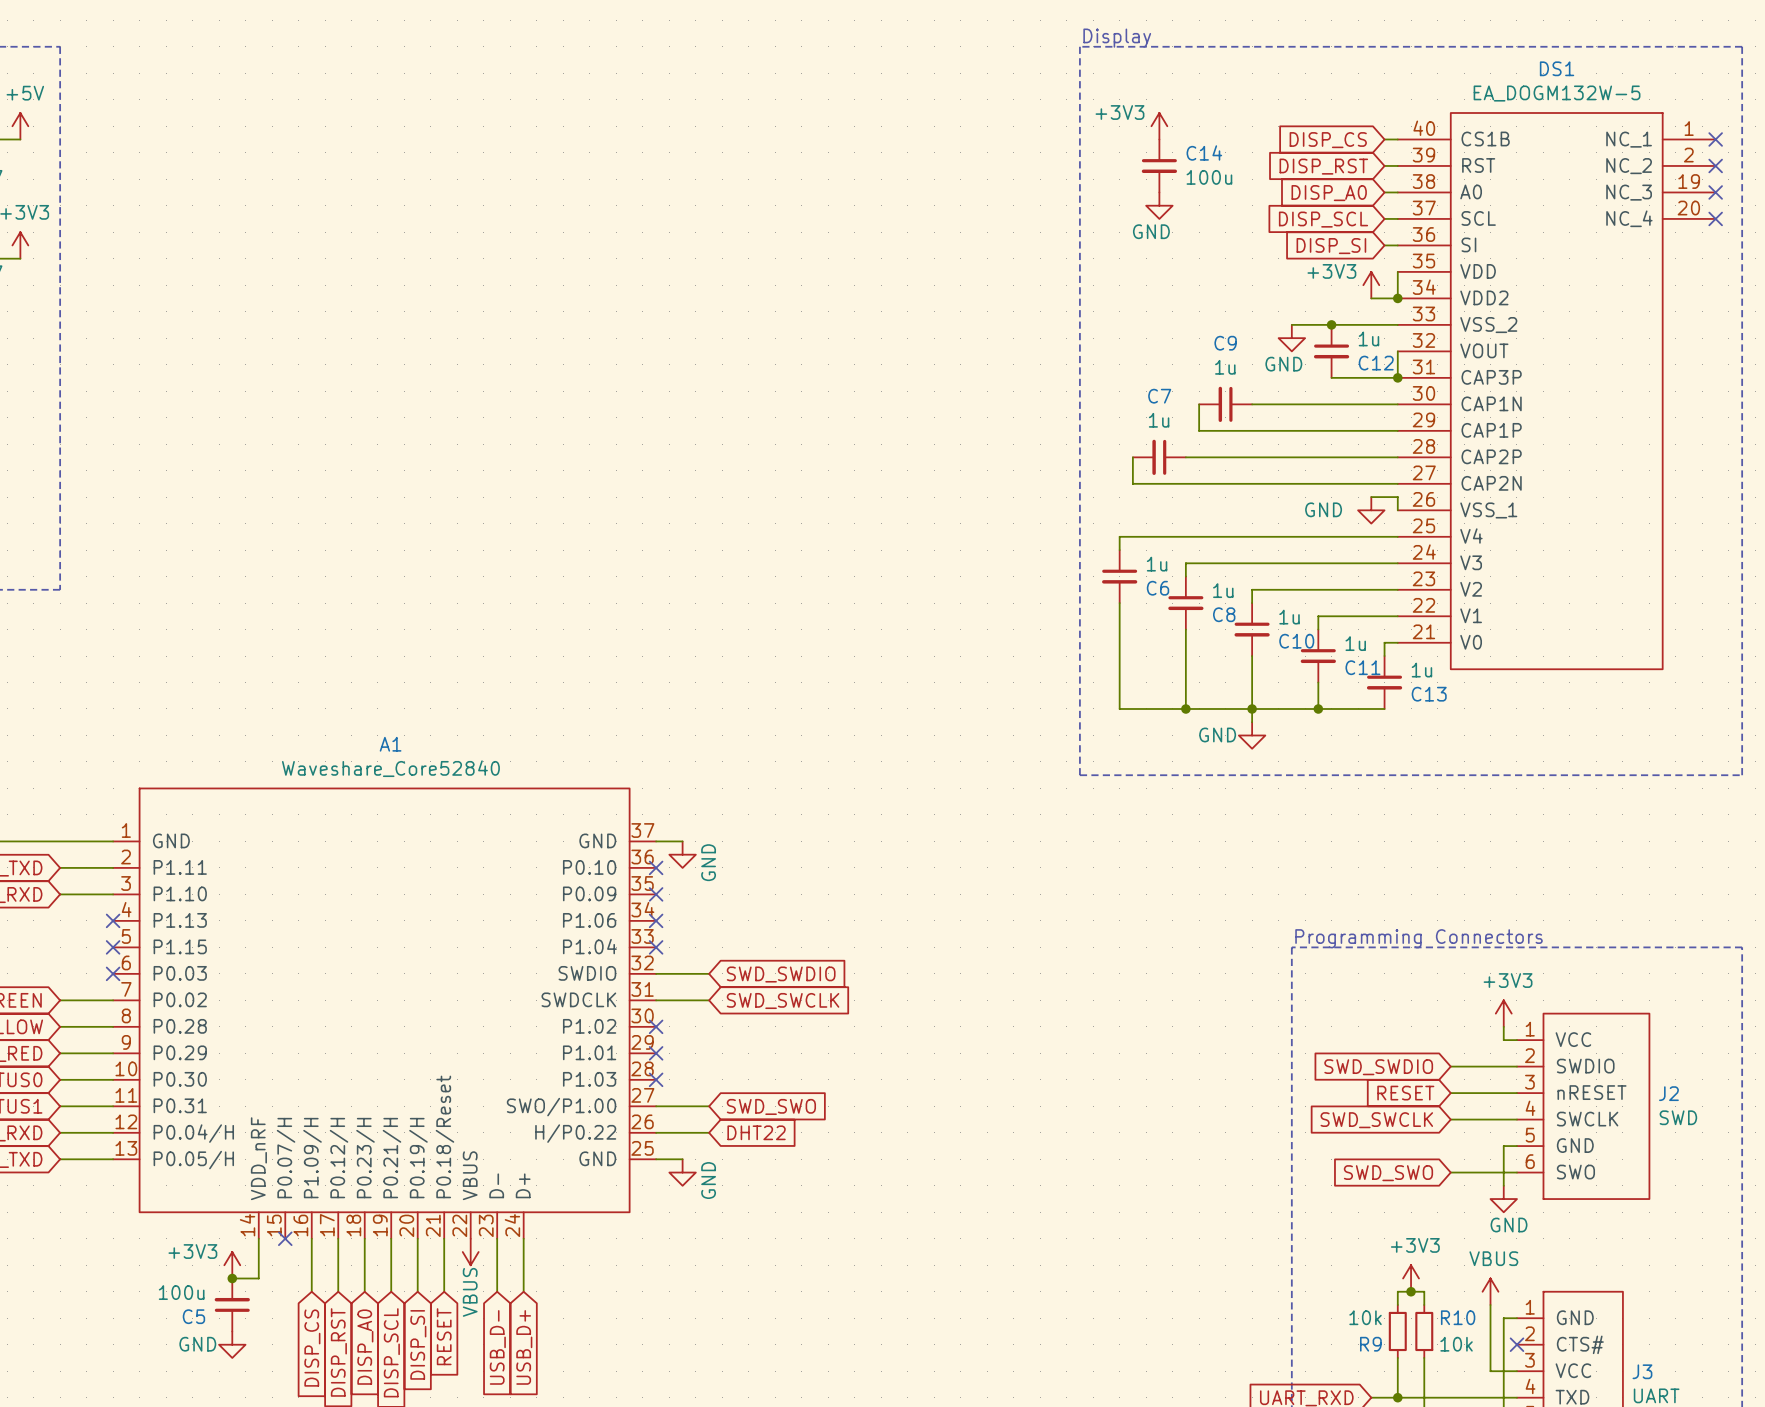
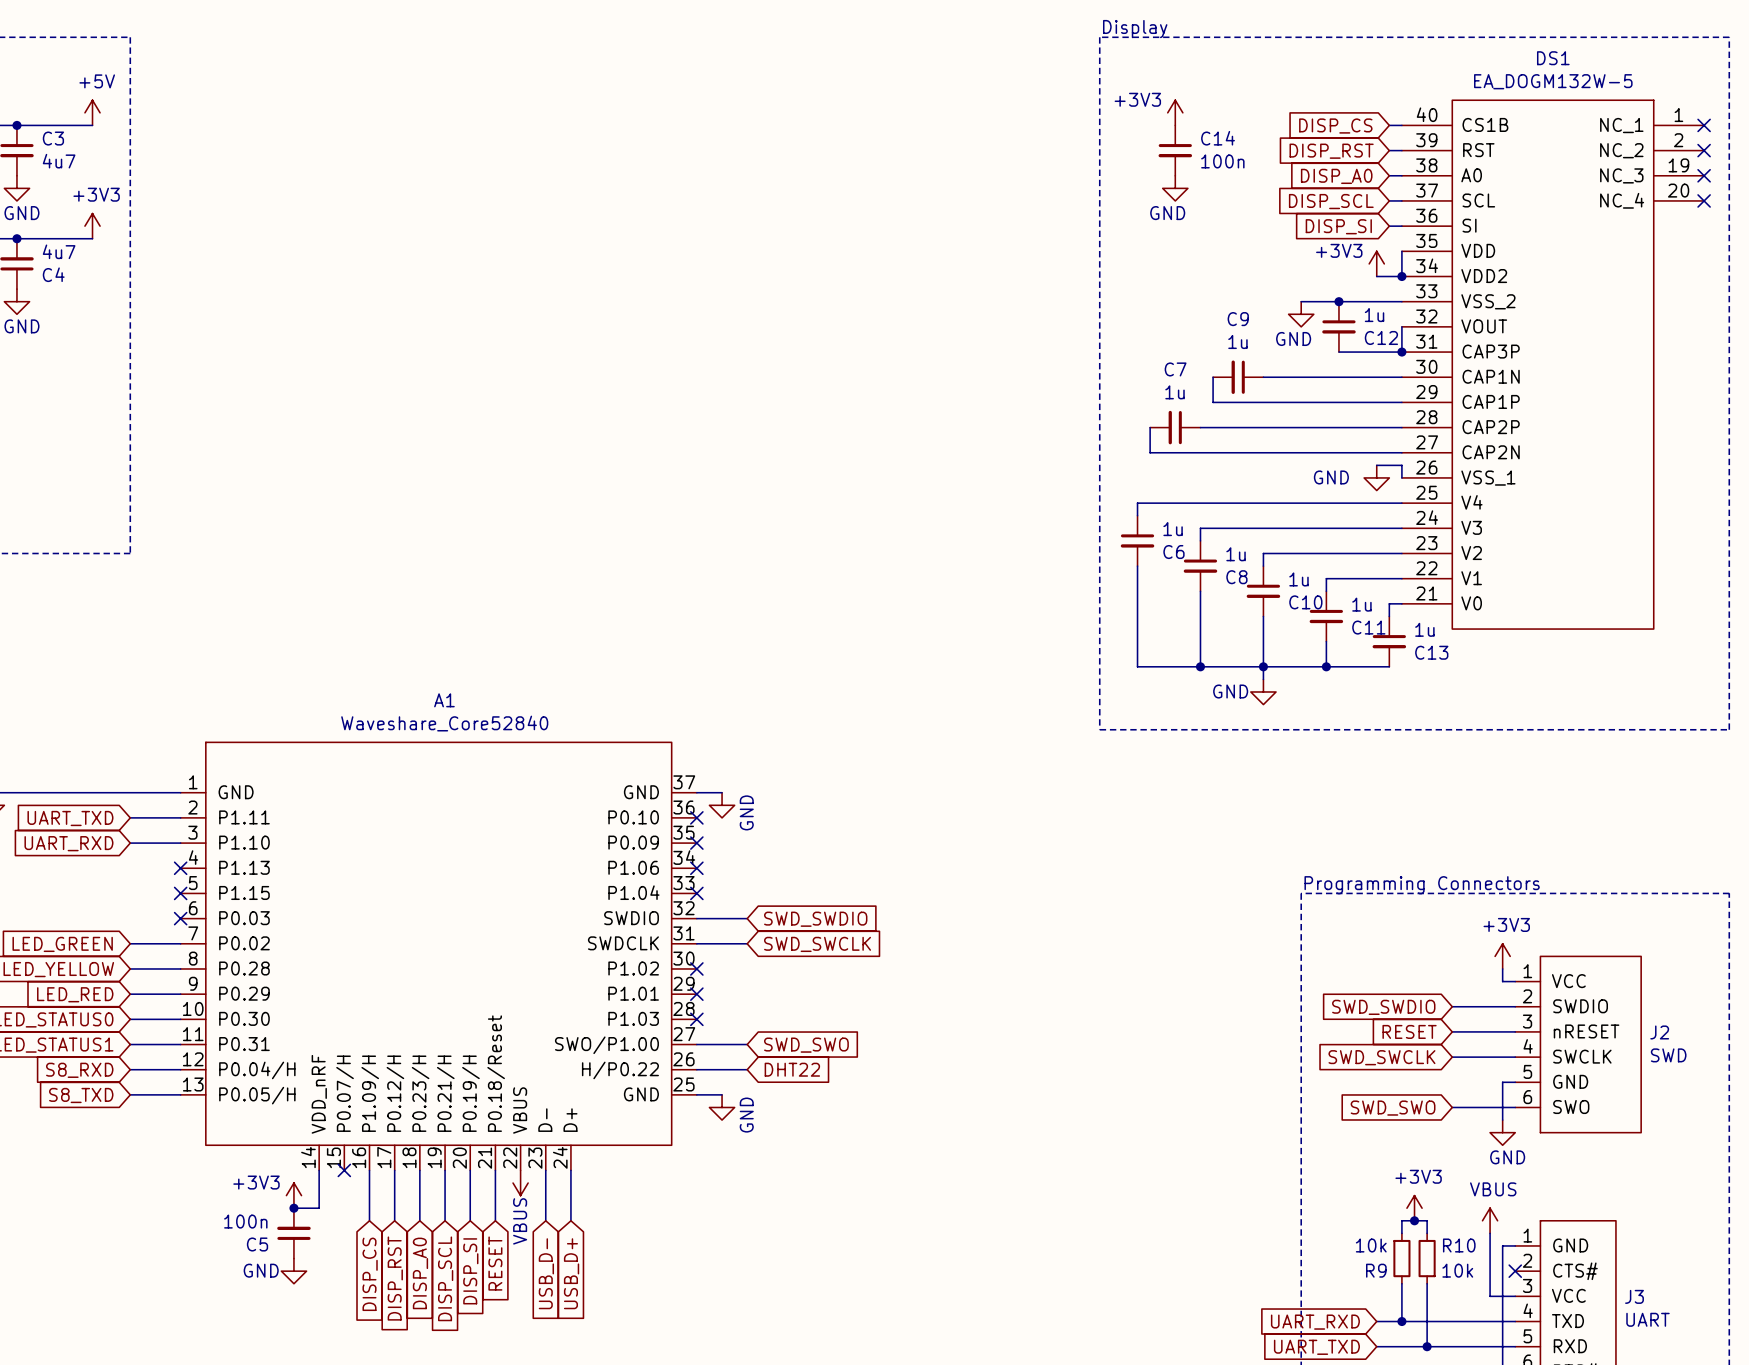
C14 value: 100u (1209, 177) -> 100n (1222, 161)
C5 value: 100u (181, 1292) -> 100n (245, 1221)

